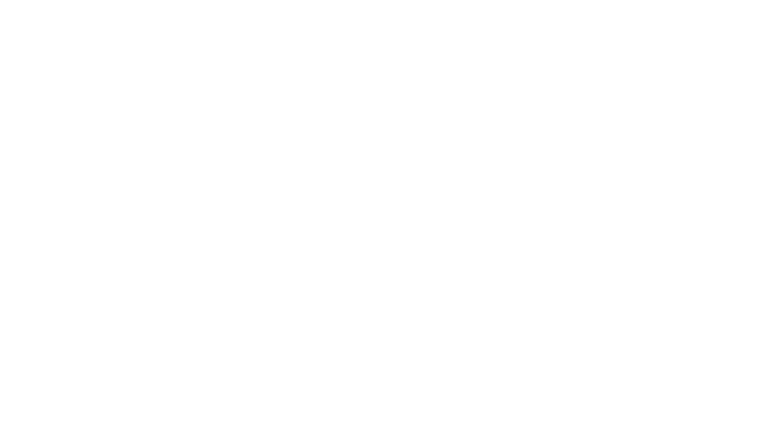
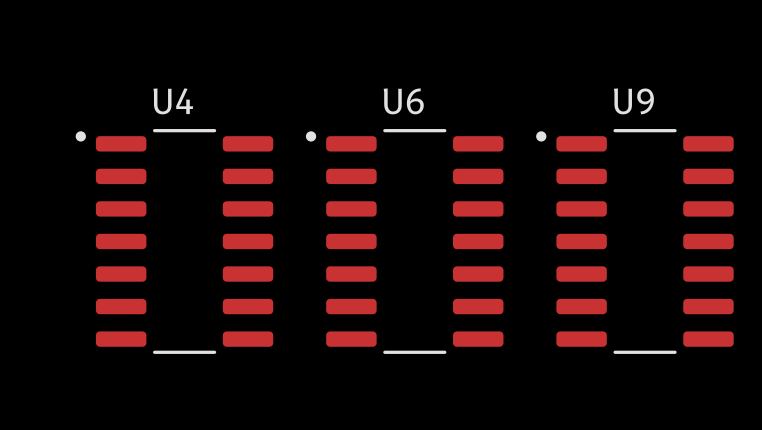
U4: none -> (174, 241)
U6: none -> (404, 241)
U9: none -> (634, 241)

